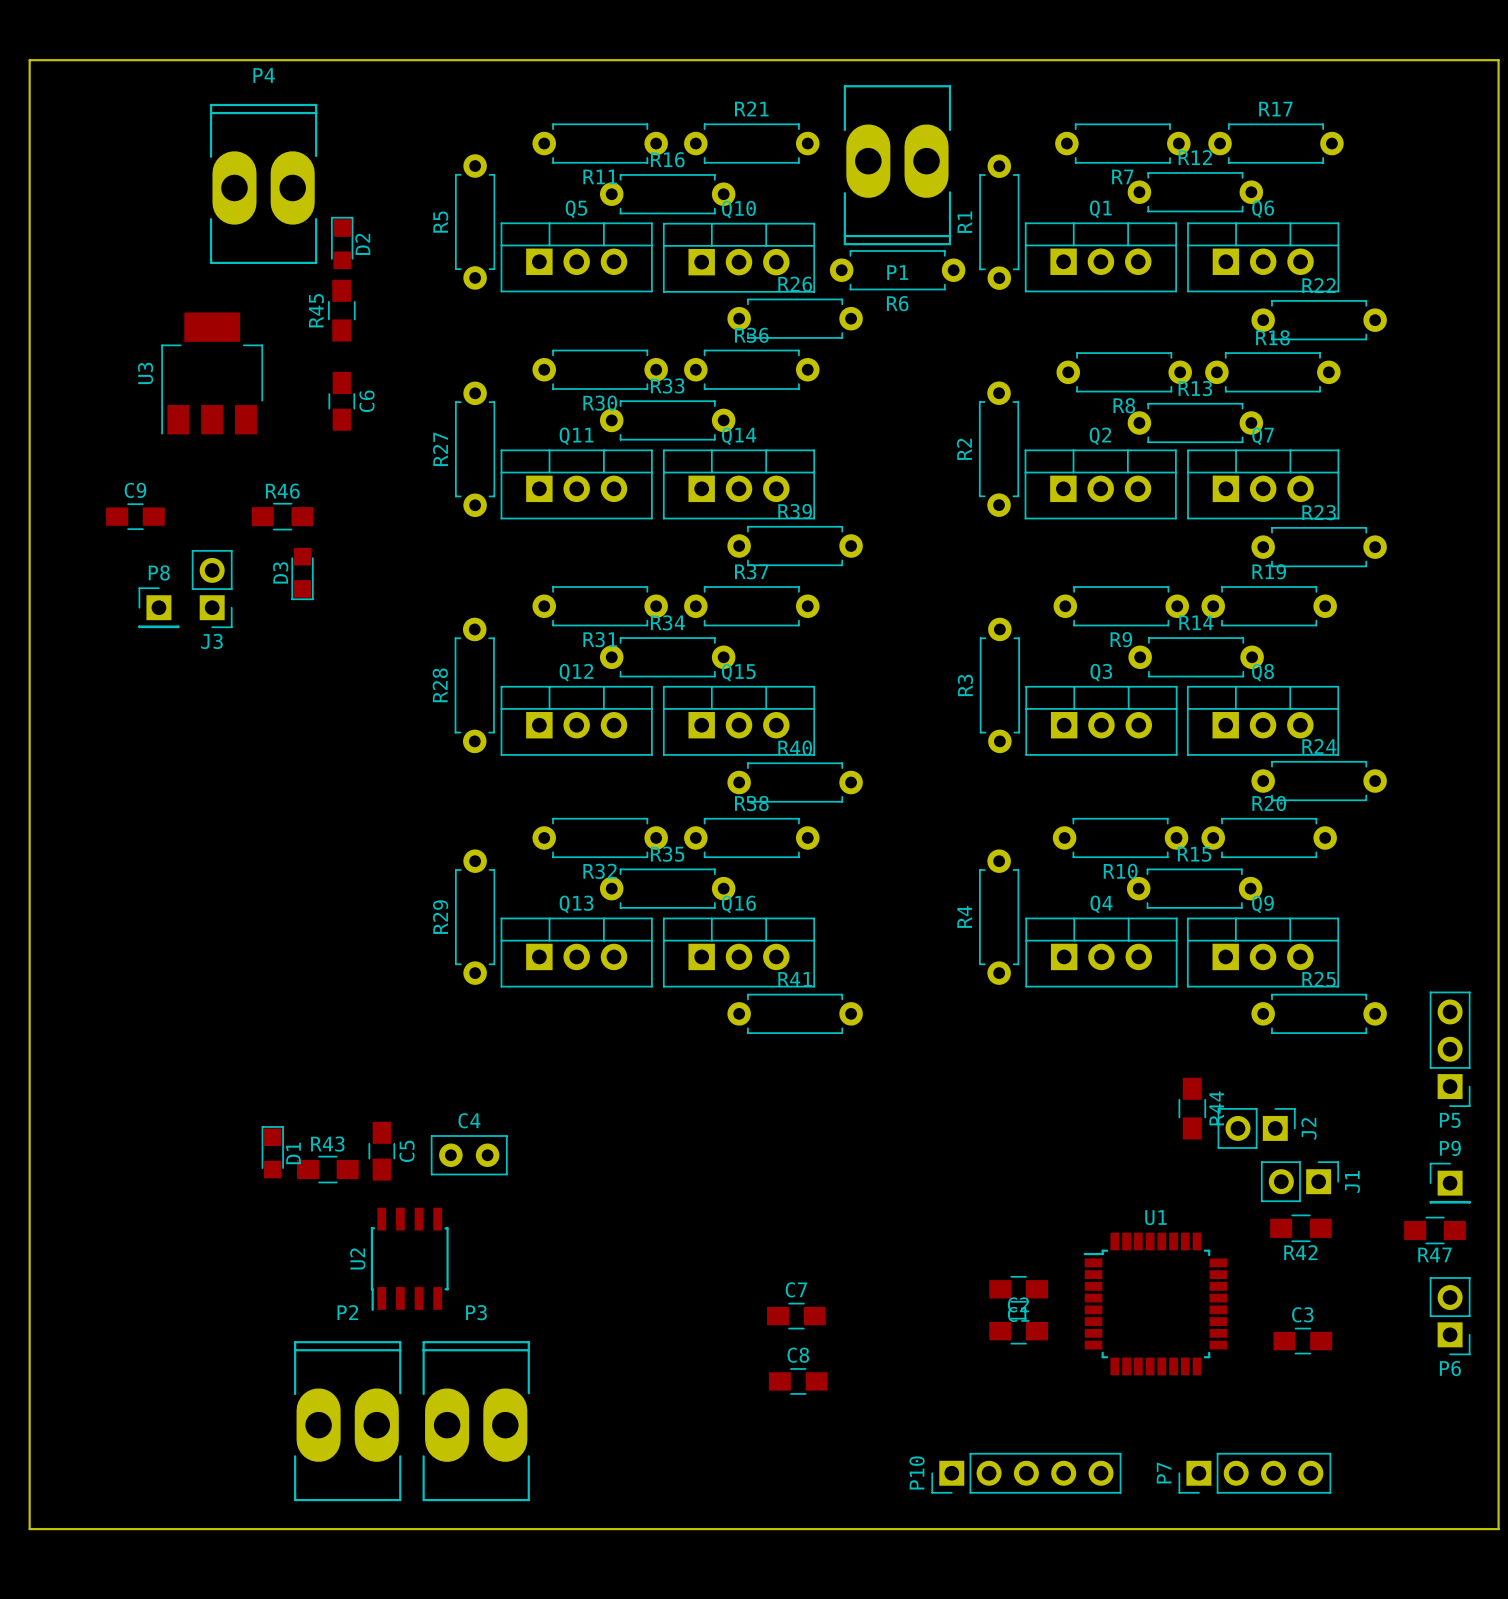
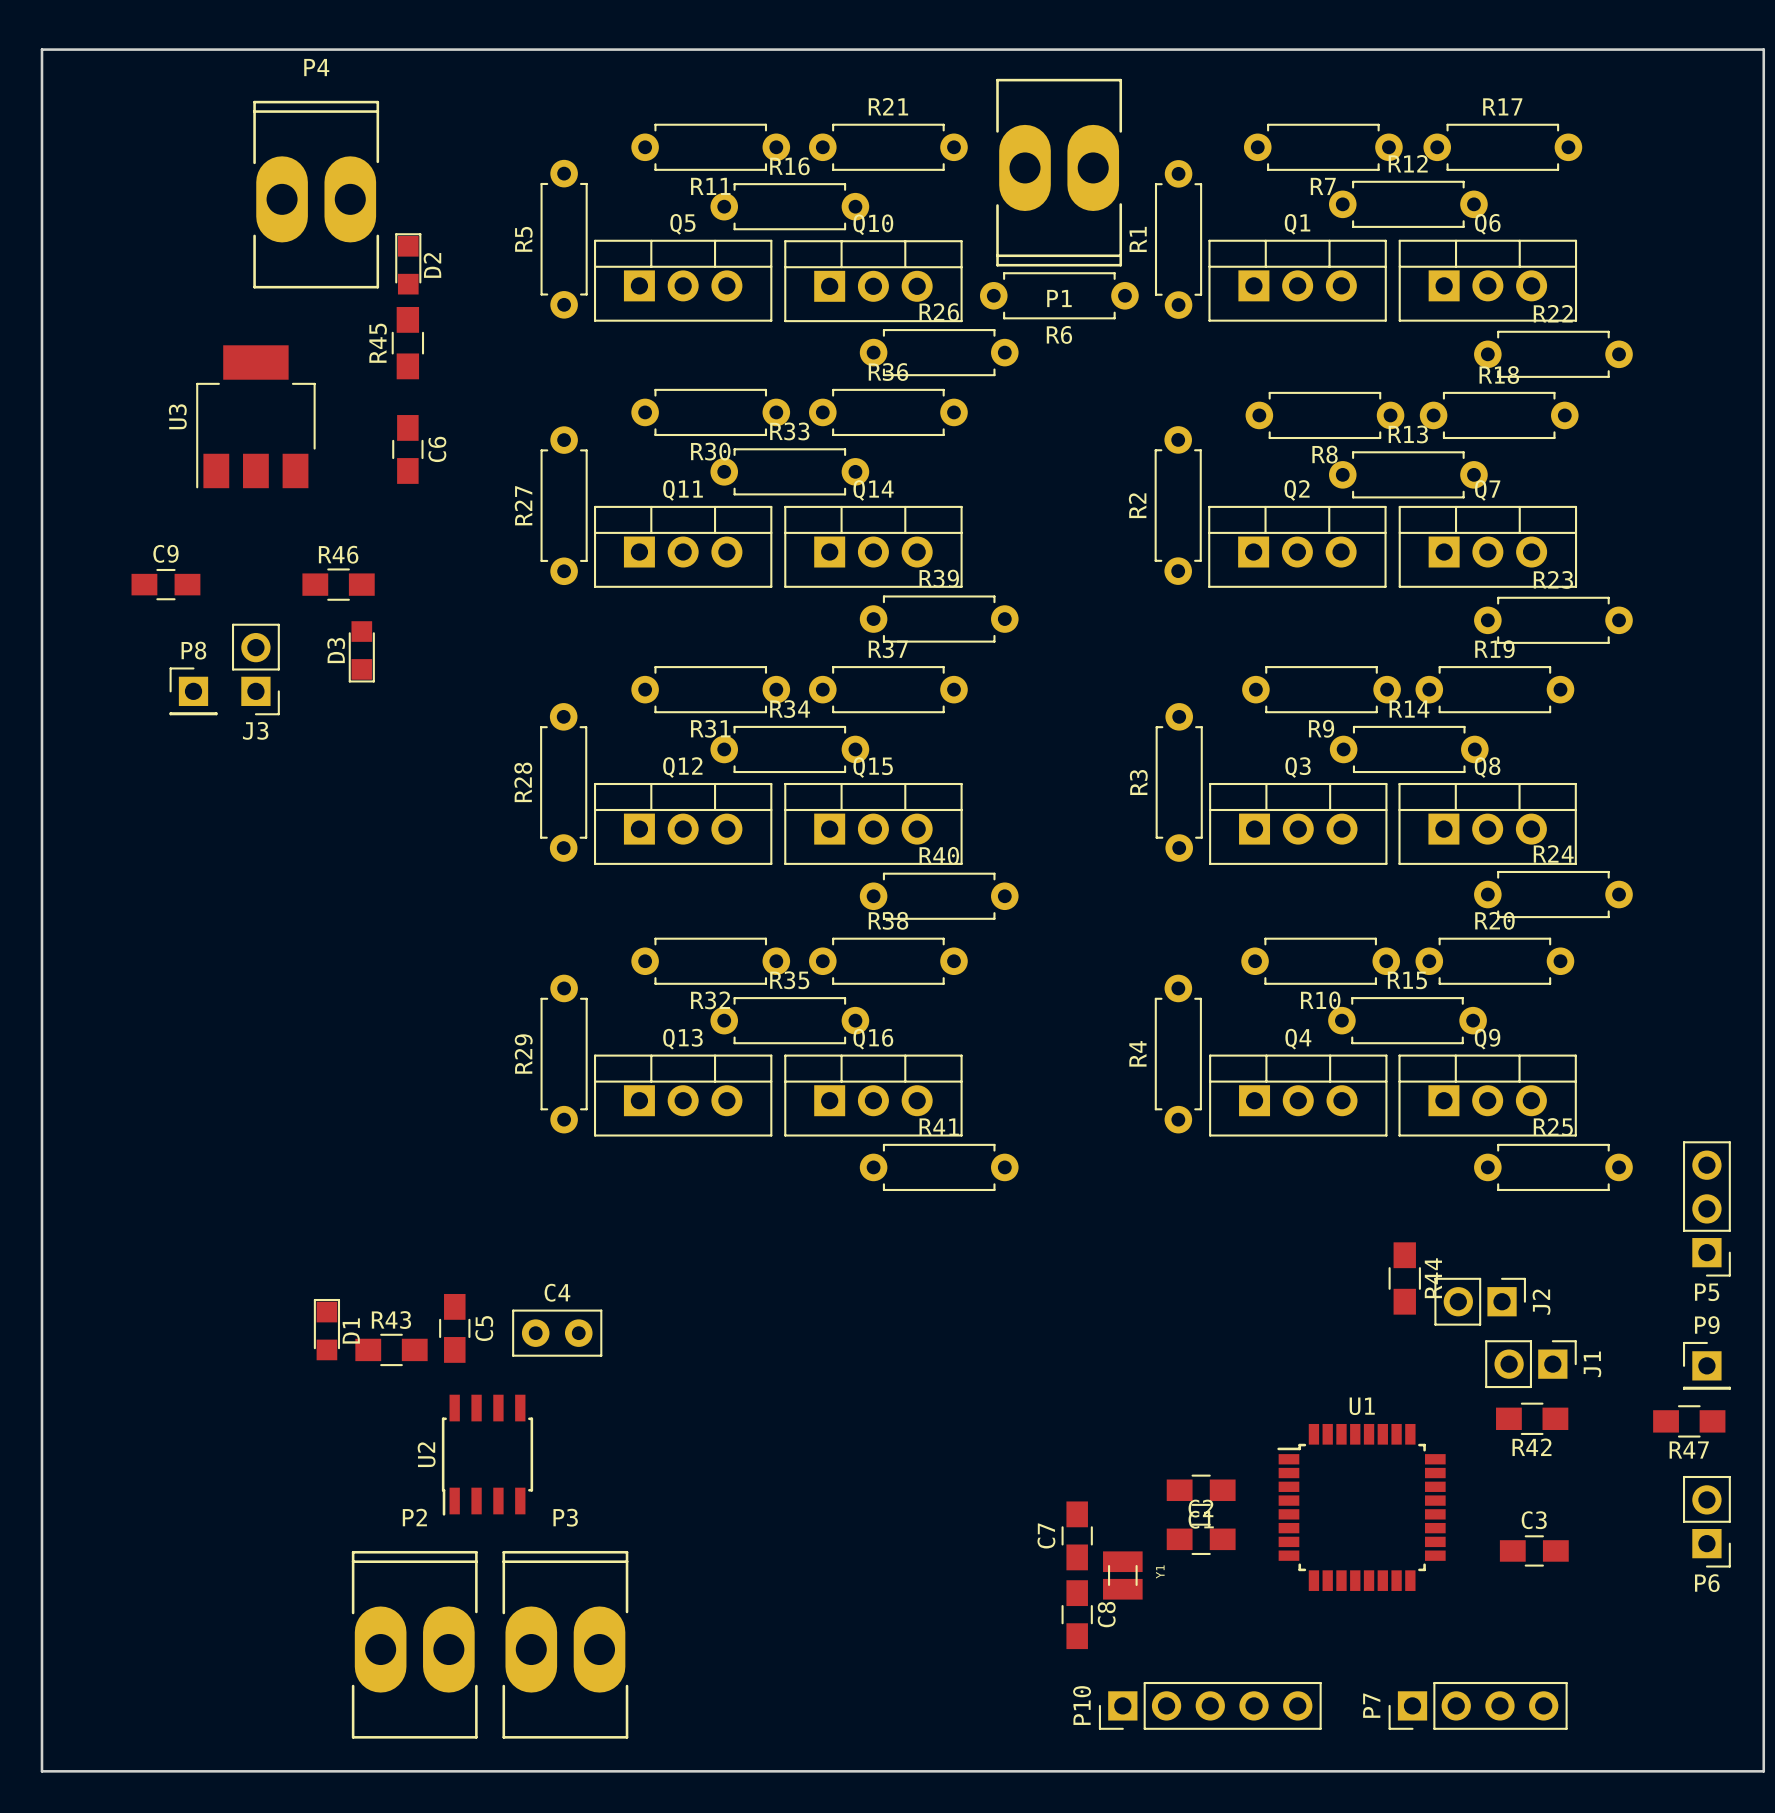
C7 name position: C7 (796, 1289) -> C7 (1046, 1535)
C7 rotation: 0° (796, 1316) -> 90° clockwise (1077, 1535)
C7 position: (796, 1316) -> (1077, 1535)
Y1: none -> (1122, 1575)
C8 rotation: 0° (798, 1381) -> 90° clockwise (1077, 1614)
C8 position: (798, 1381) -> (1077, 1614)

